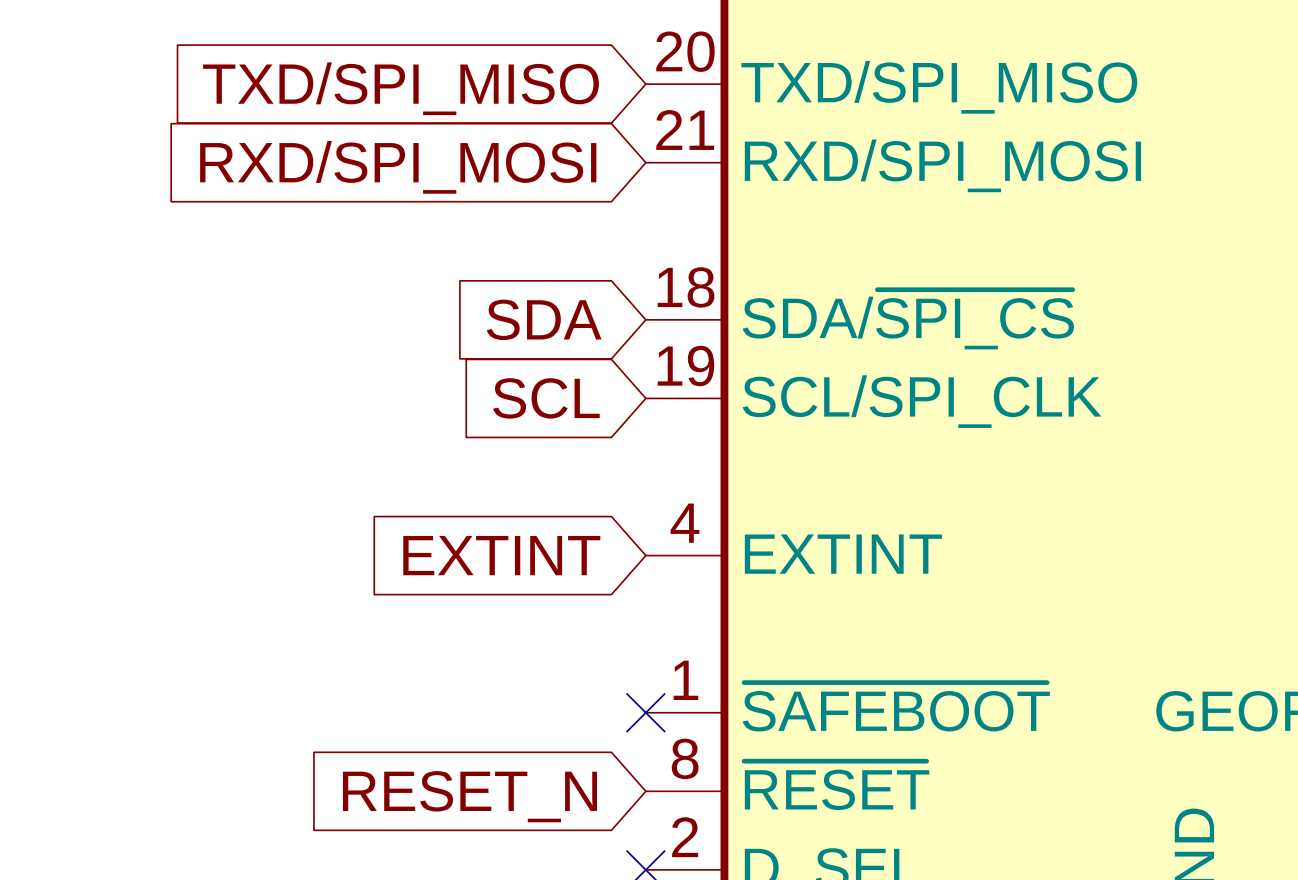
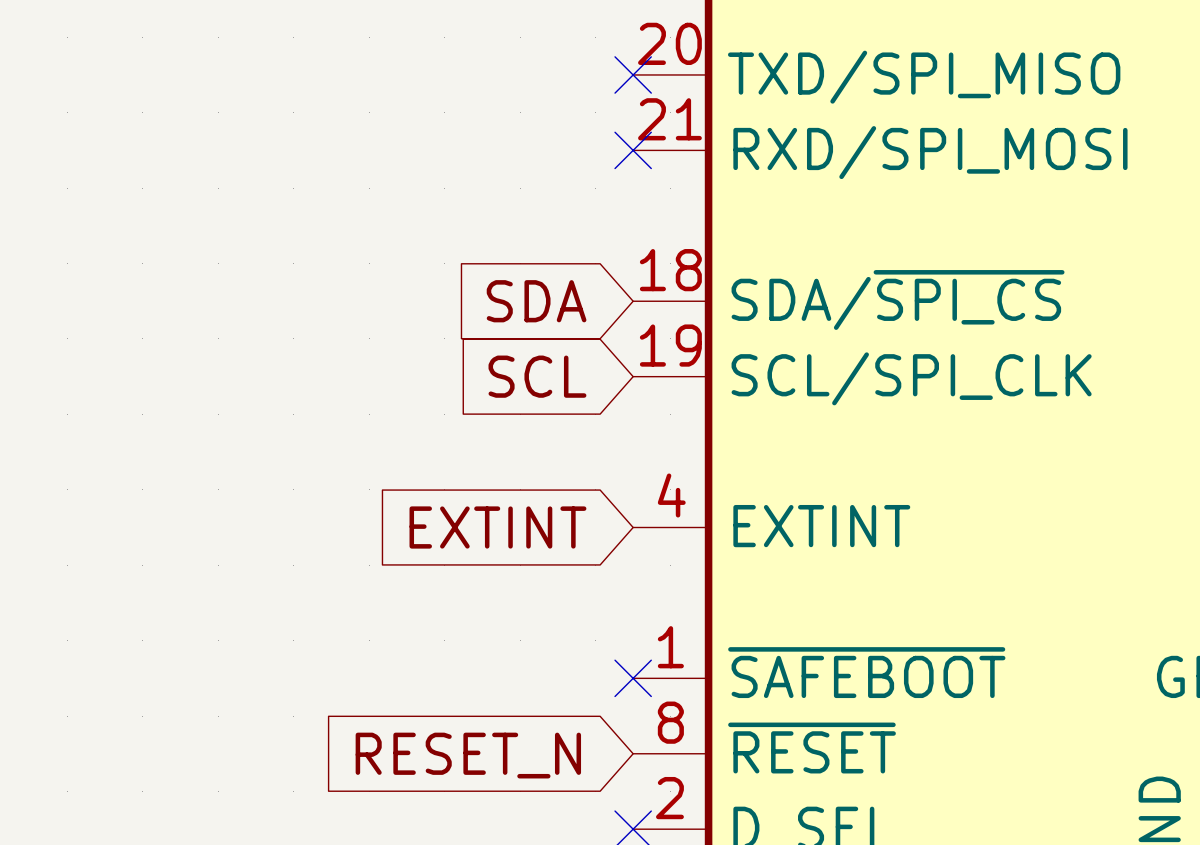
no-connect mark: none -> (633, 74)
global label: TXD/SPI_MISO (401, 88) -> none
no-connect mark: none -> (633, 150)
global label: RXD/SPI_MOSI (398, 167) -> none

